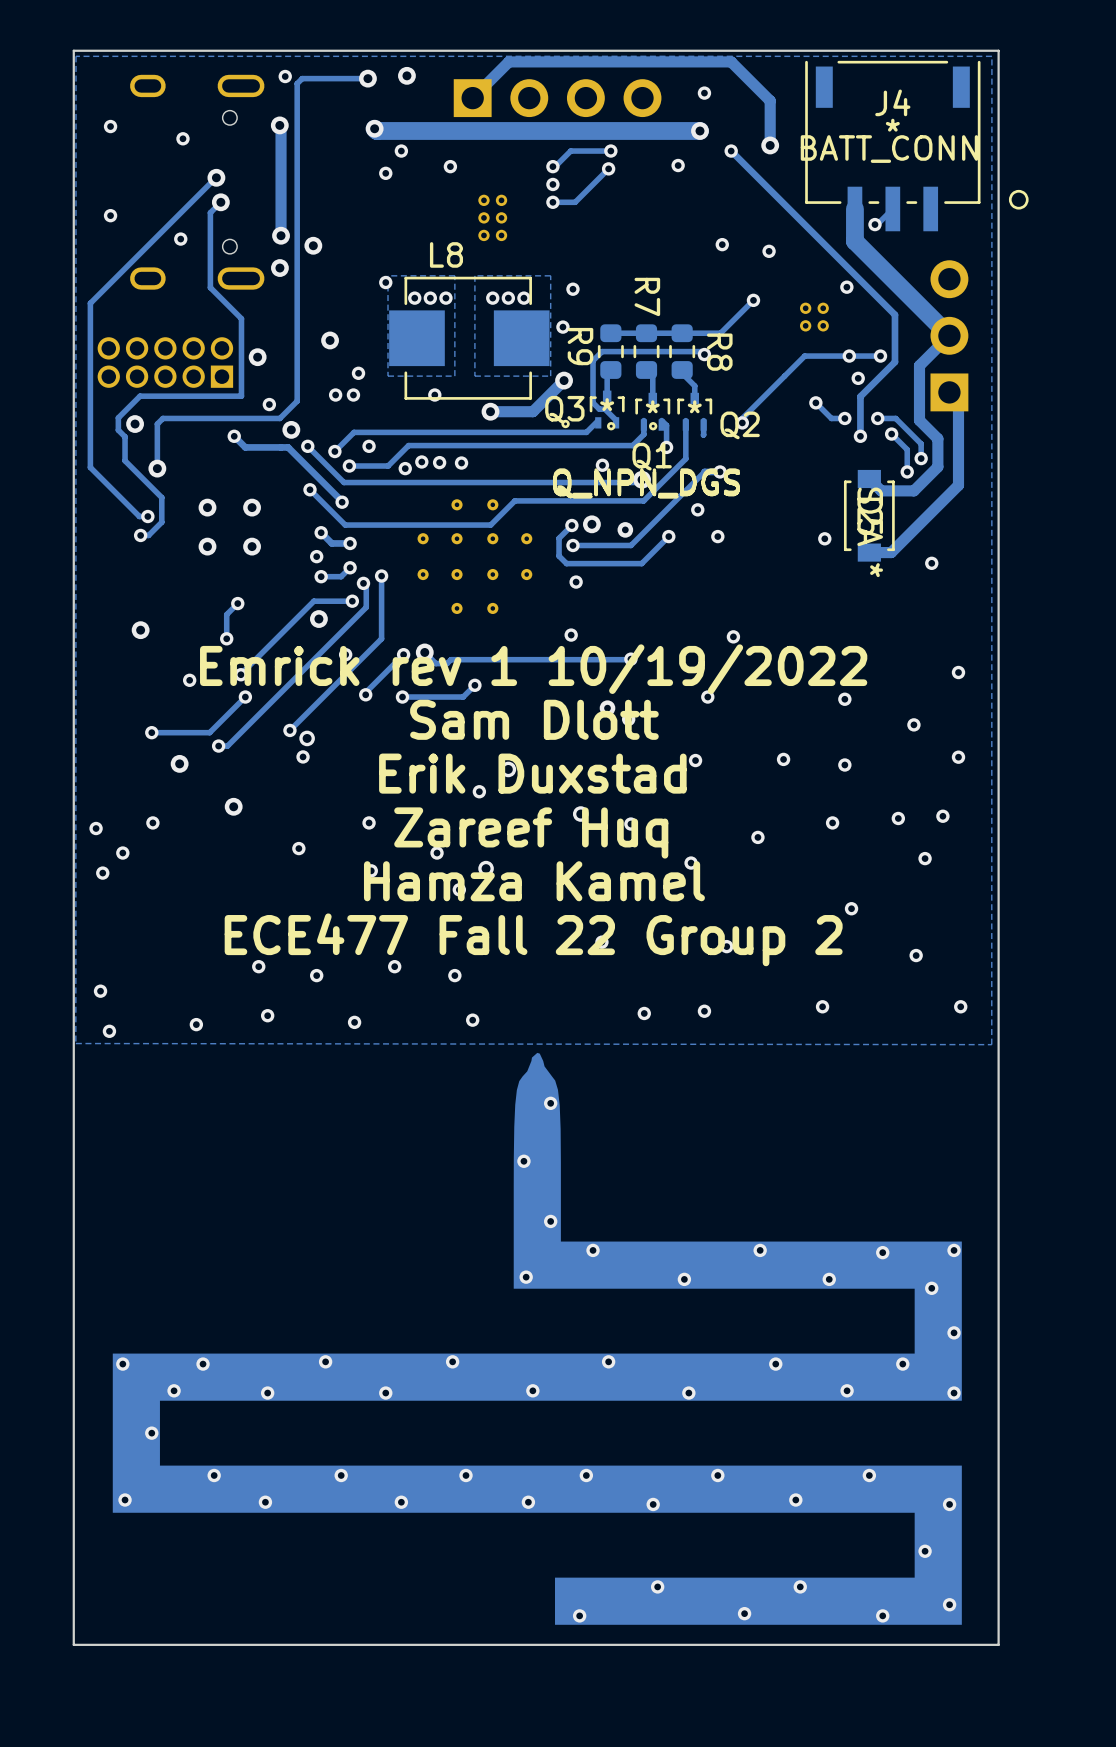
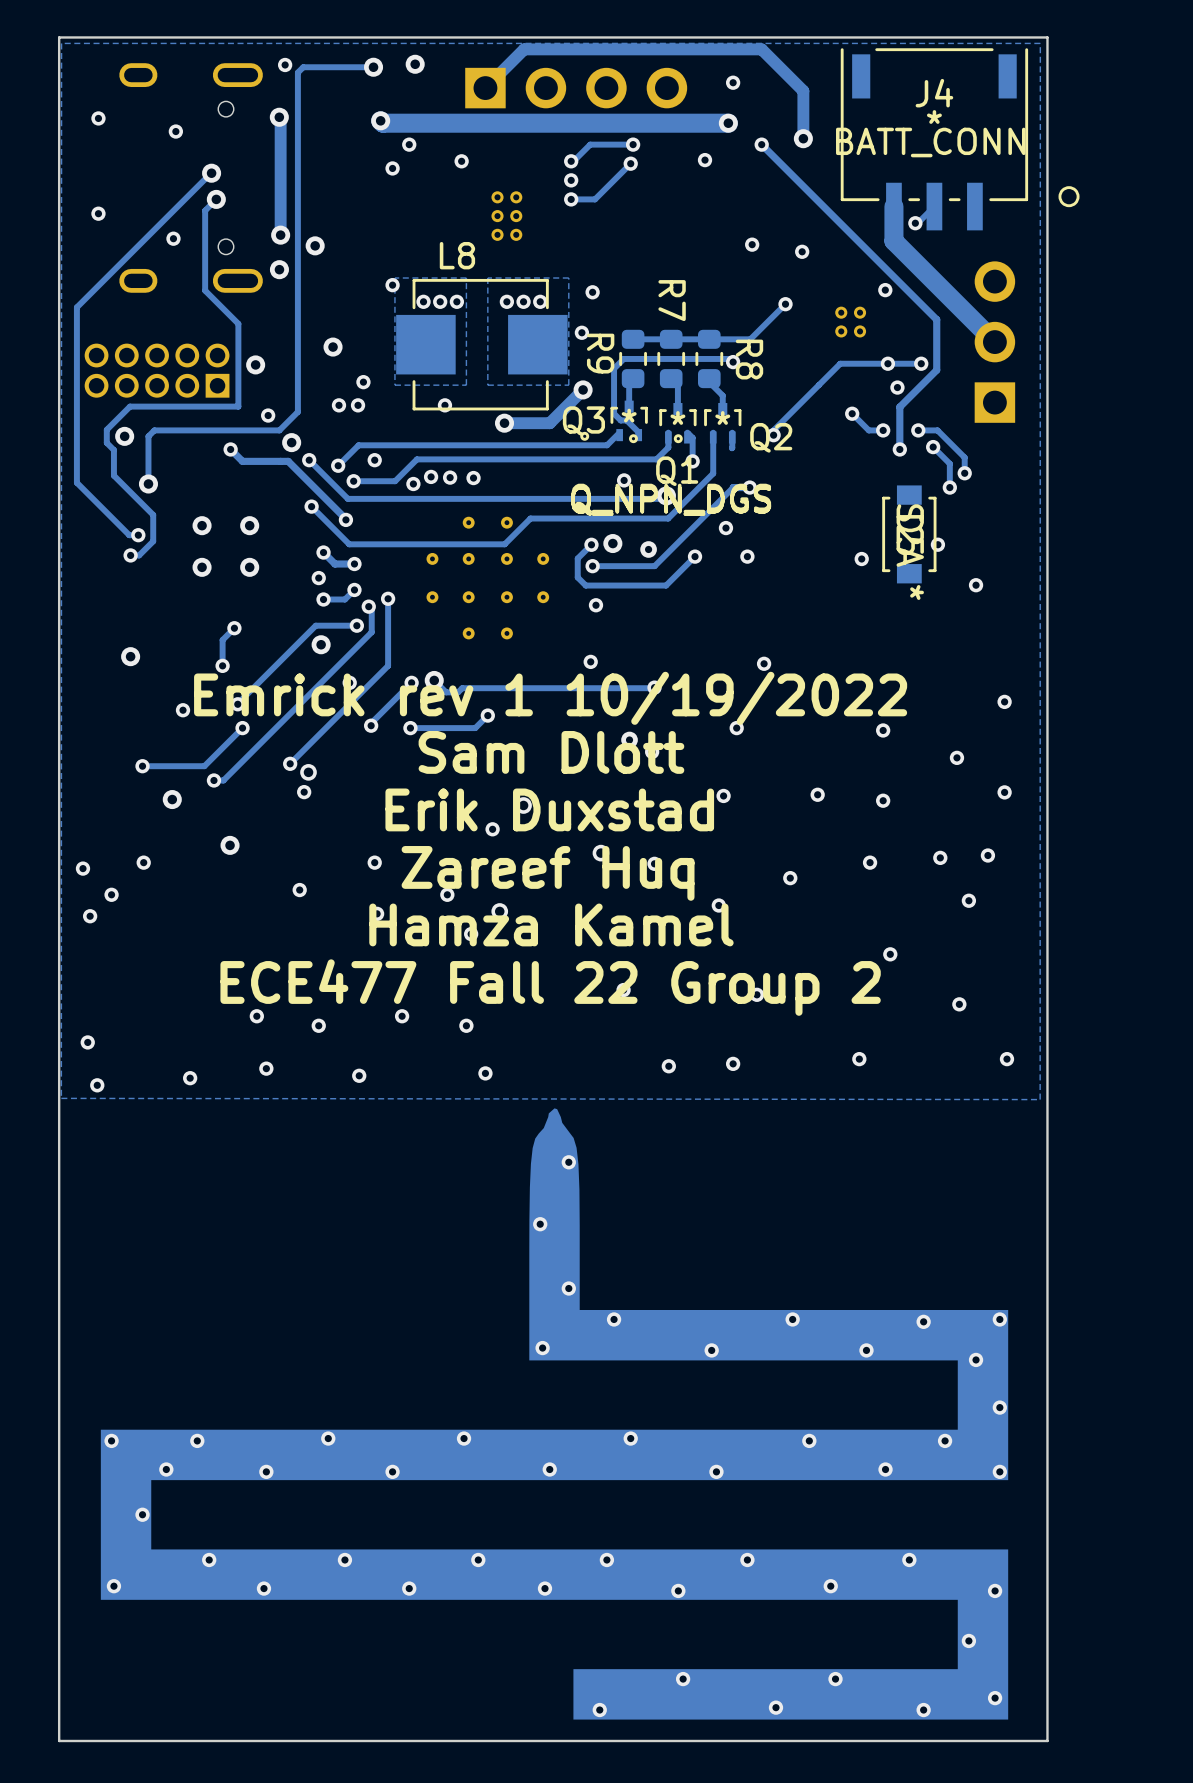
track: (949, 335) (919, 365) (919, 420) (937, 438) (937, 466) (913, 490) (881, 490) (869, 478) -> none
track: (949, 392) (958, 401) (958, 485) (891, 552) (869, 552) -> none
via: none -> (937, 544)

